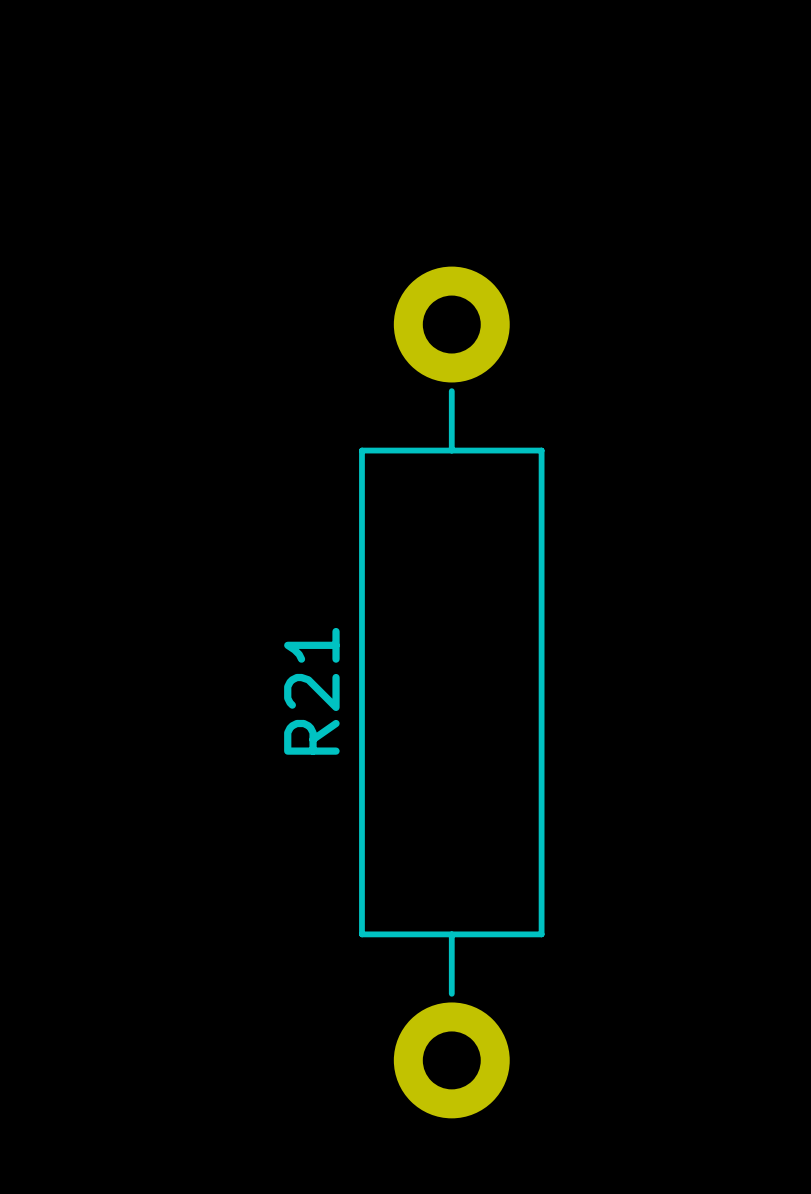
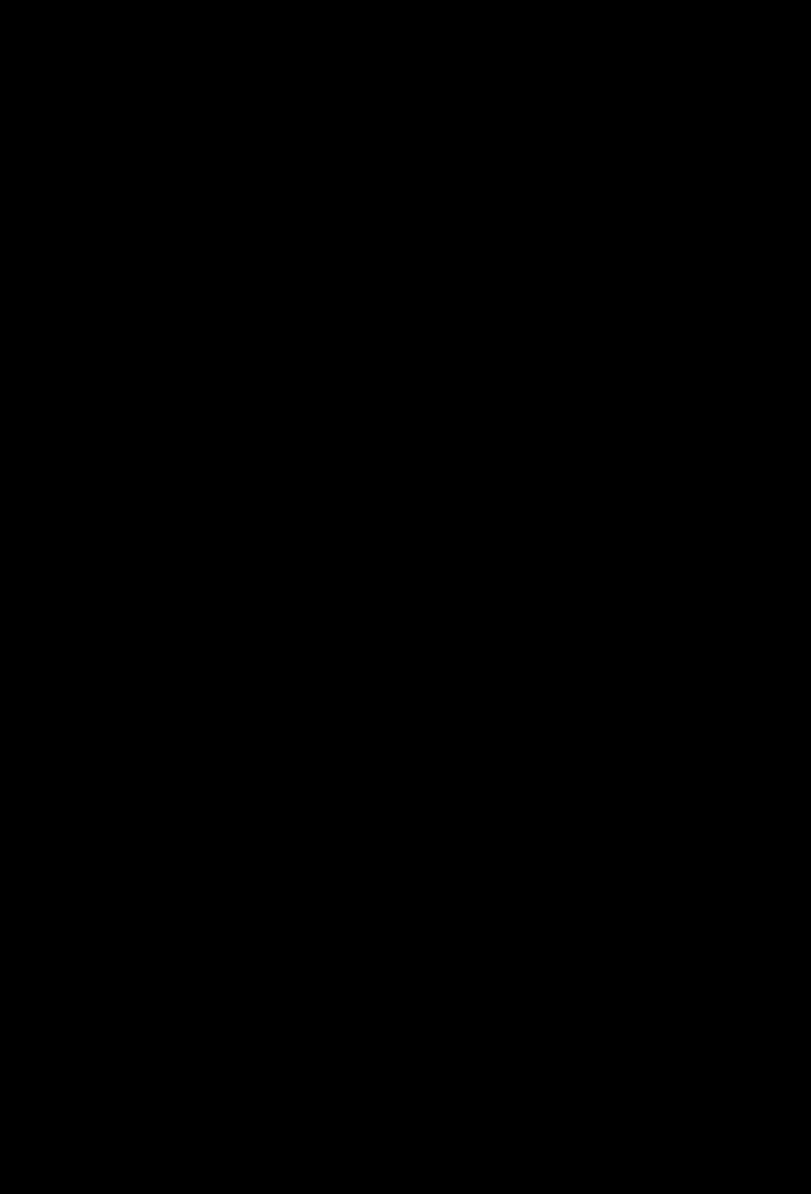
R21: (451, 692) -> none

